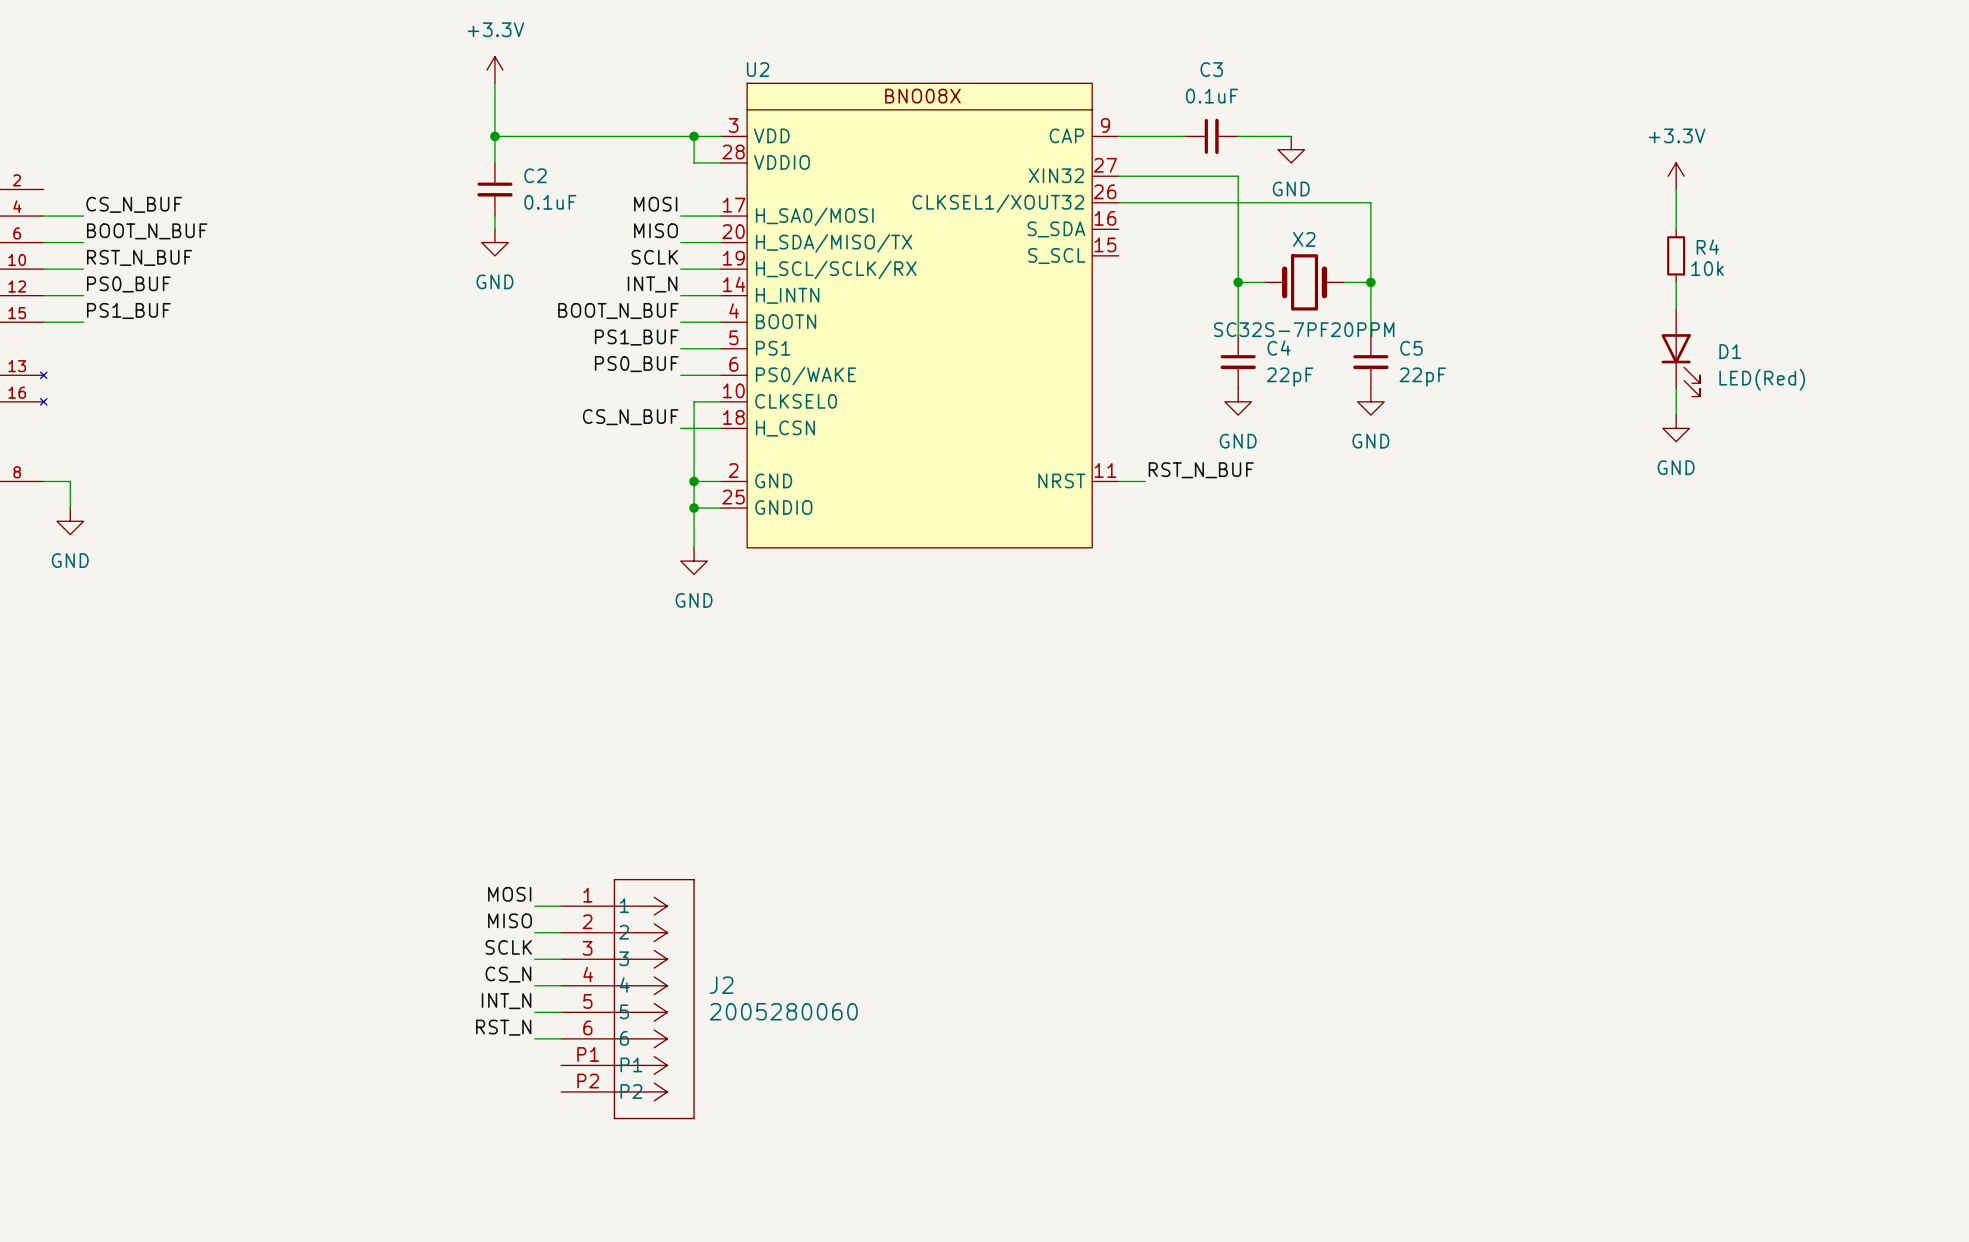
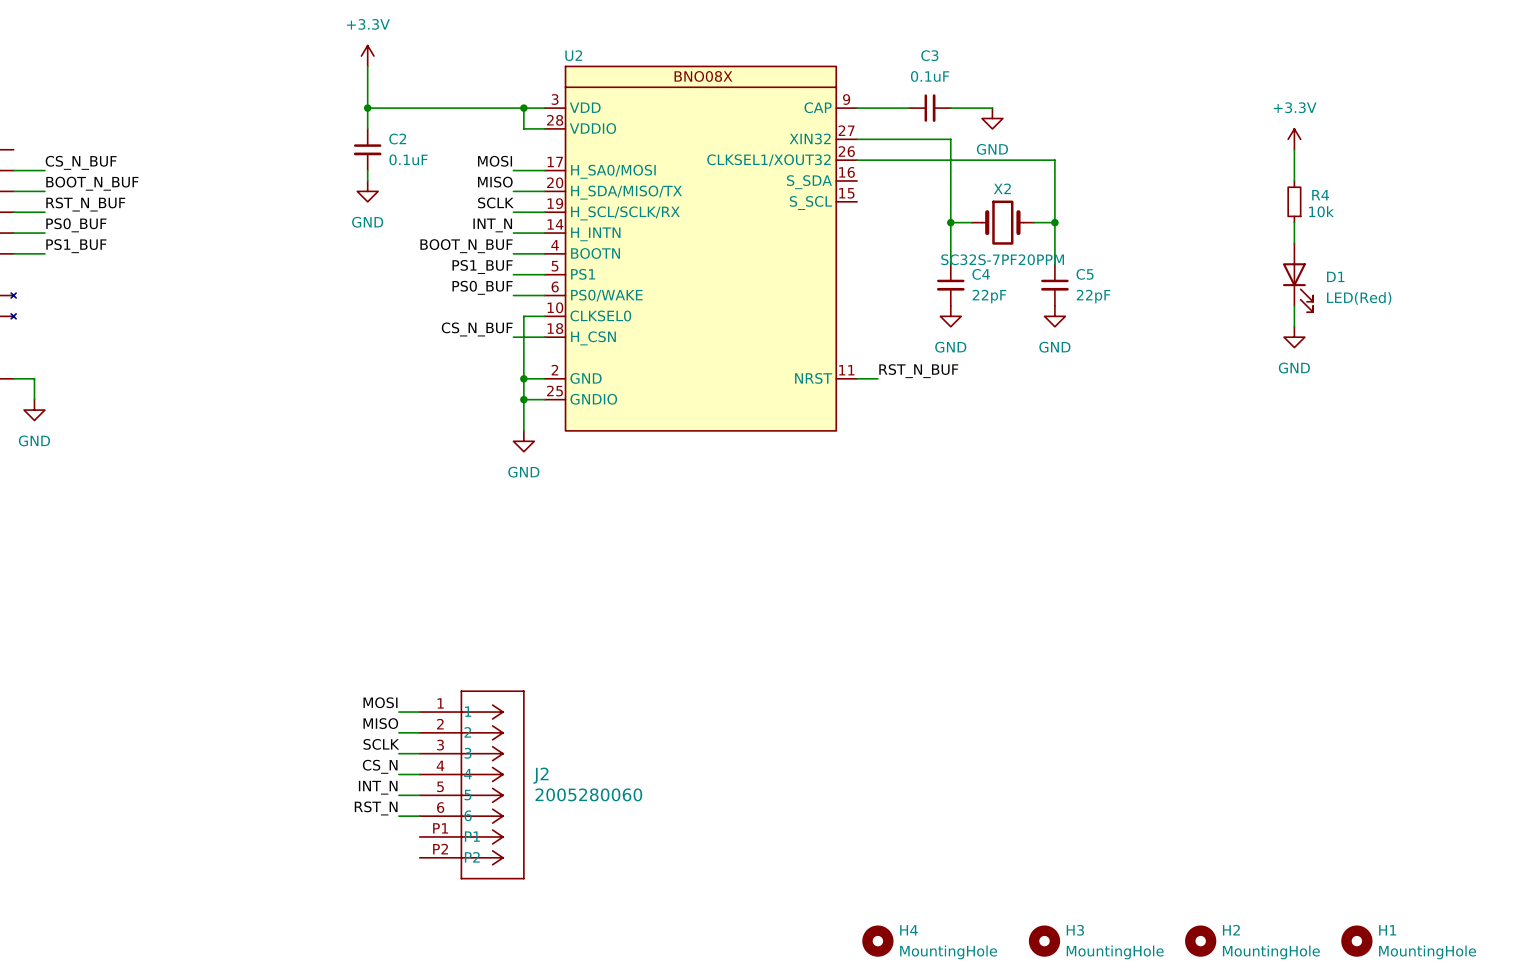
H4: none -> MountingHole (877, 941)
H3: none -> MountingHole (1044, 941)
H2: none -> MountingHole (1200, 941)
H1: none -> MountingHole (1356, 941)

